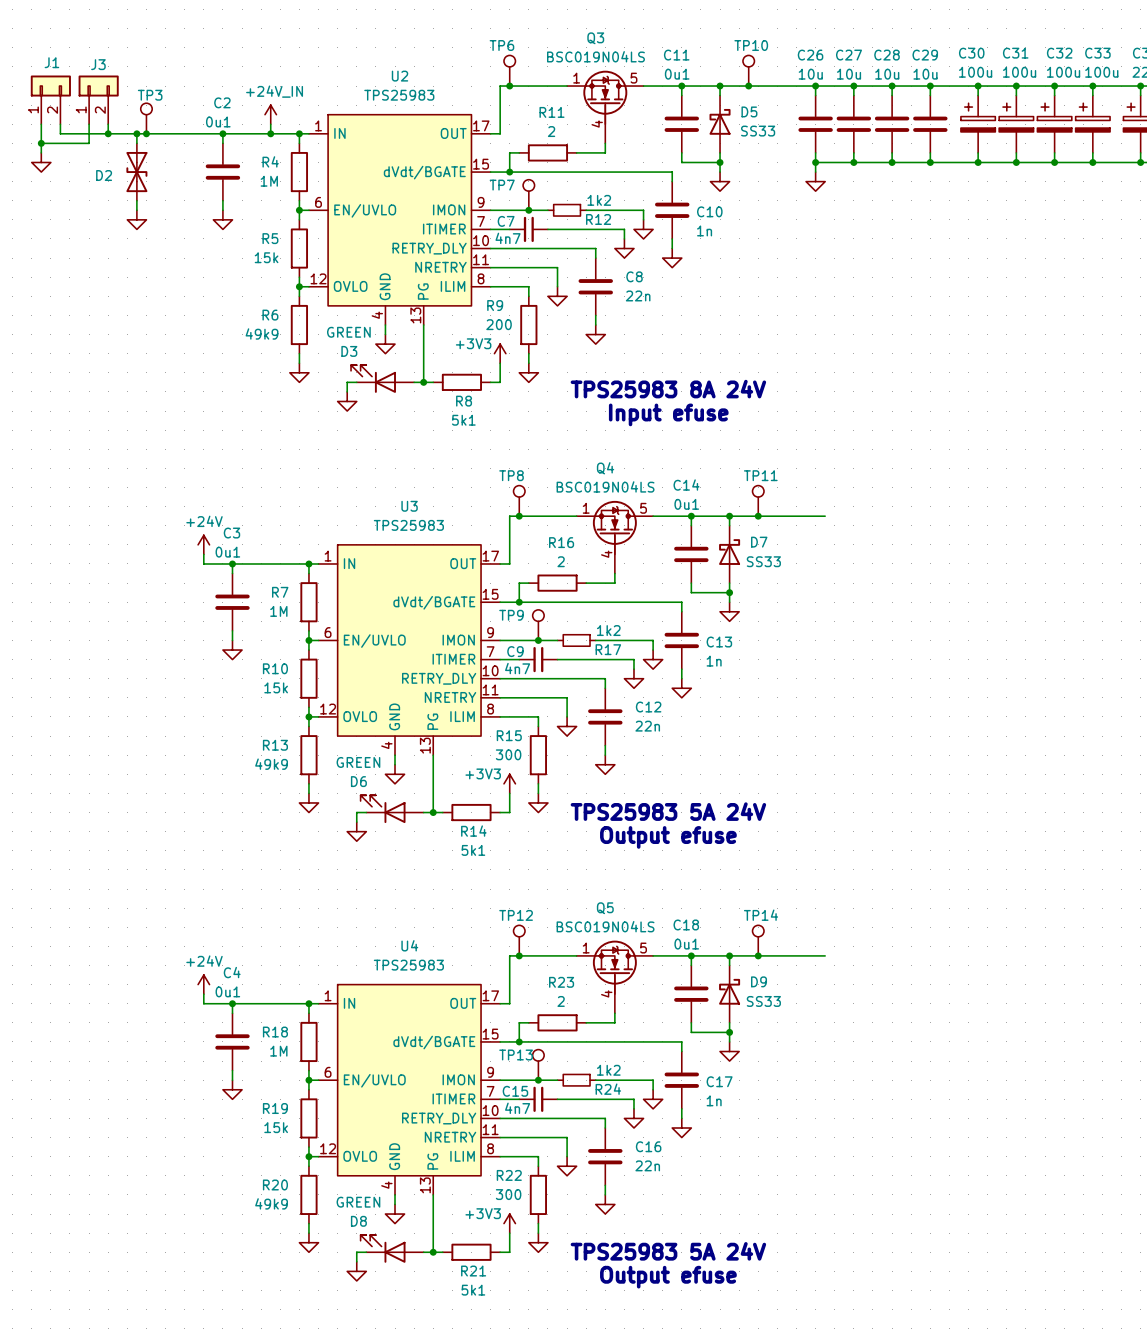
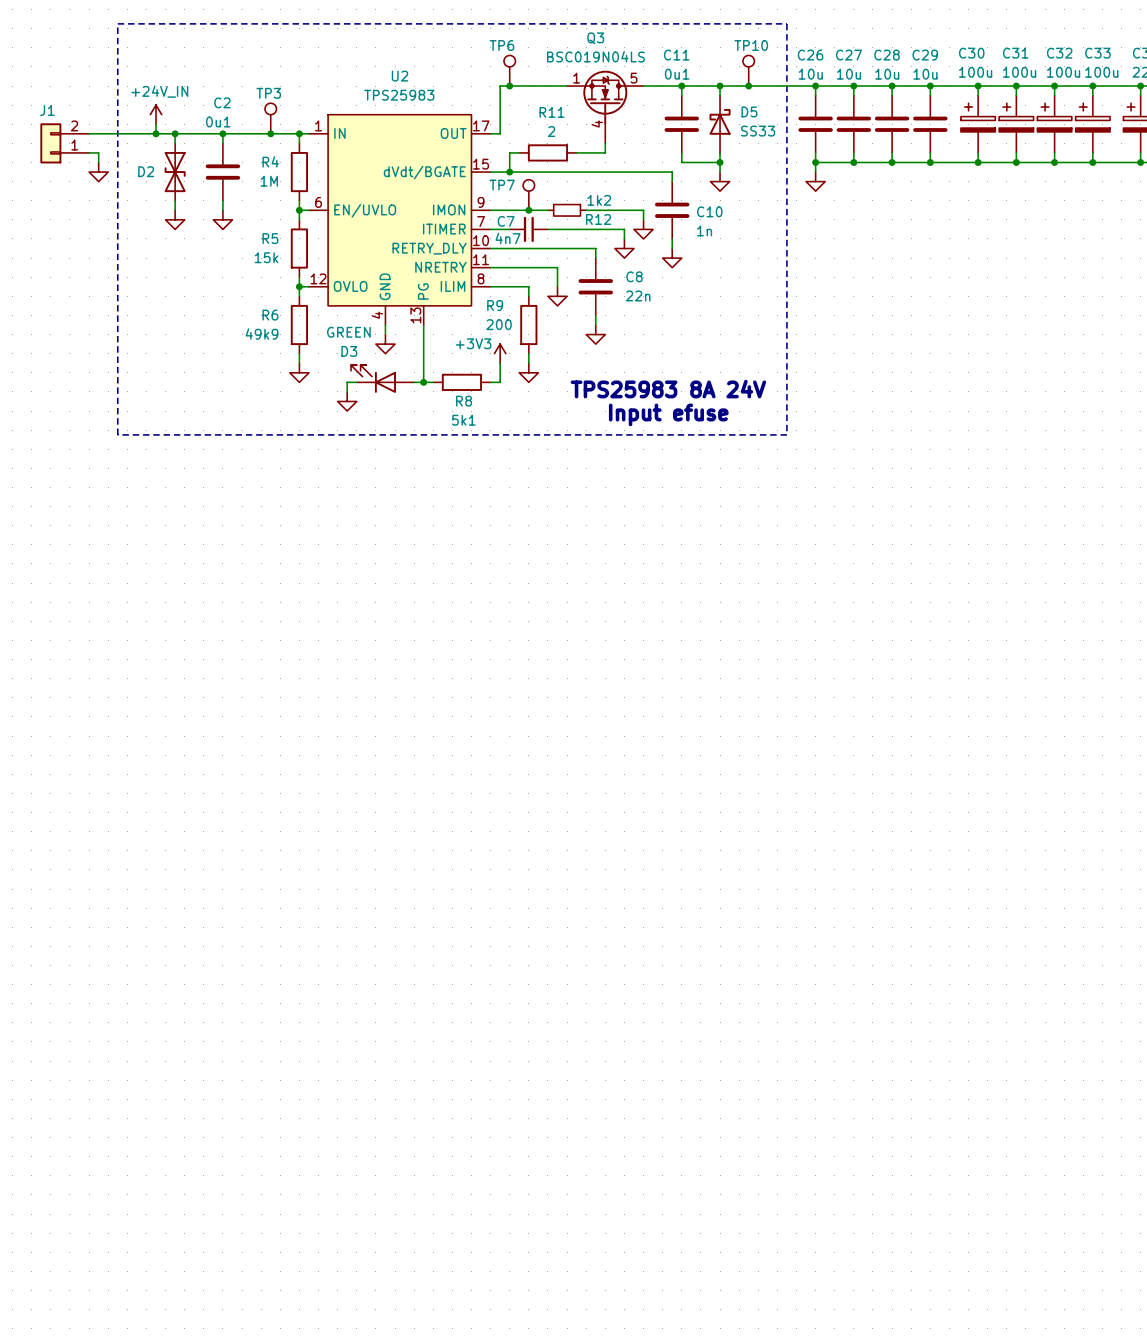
line: none -> (117, 23) (786, 23) (786, 434) (117, 434) (117, 23)
J1 name position: J1 (51, 62) -> J1 (47, 110)
J1 rotation: 0° (50, 86) -> 90° counterclockwise (50, 143)
TP3 name position: TP3 (150, 95) -> TP3 (268, 93)
J1 position: (50, 99) -> (64, 143)
J3: (98, 99) -> none
power symbol position: +24V_IN (270, 114) -> +24V_IN (156, 114)
TP3 position: (146, 118) -> (270, 118)
wire: (89, 124) (89, 143) (41, 143) -> none
wire: (108, 124) (108, 133) -> (156, 124) (156, 133)
junction: (108, 133) -> none
wire: (136, 133) (136, 143) -> (175, 133) (175, 143)
junction: (136, 133) -> none
junction: (146, 133) -> none
junction: none -> (156, 133)
junction: none -> (175, 133)
junction: (41, 143) -> none
wire: none -> (89, 152) (98, 152) (98, 162)
power symbol: (41, 162) -> none
power symbol: none -> (98, 172)
D2 position: (136, 172) -> (175, 172)
D2 name position: D2 (104, 175) -> D2 (146, 171)
wire: (136, 200) (136, 210) -> (175, 200) (175, 210)
power symbol: (136, 219) -> none
power symbol: none -> (175, 219)
TP8: (519, 500) -> none
TP11: (758, 500) -> none
junction: (519, 516) -> none
wire: (576, 516) (509, 516) (509, 563) (500, 563) -> none
wire: (653, 516) (825, 516) -> none
wire: (691, 516) (691, 525) -> none
junction: (691, 516) -> none
wire: (729, 516) (729, 525) -> none
junction: (729, 516) -> none
junction: (758, 516) -> none
Q4: BSC019N04LS (614, 537) -> none
power symbol: +24V (203, 544) -> none
wire: (203, 554) (203, 563) (318, 563) -> none
C14: 0u1 (691, 554) -> none
D7: SS33 (729, 554) -> none
wire: (232, 563) (232, 573) -> none
junction: (232, 563) -> none
wire: (308, 563) (308, 573) -> none
junction: (308, 563) -> none
wire: (614, 573) (614, 583) (586, 583) -> none
wire: (528, 583) (519, 583) (519, 602) -> none
R16: 2 (557, 583) -> none
wire: (691, 583) (691, 592) (729, 592) -> none
wire: (729, 583) (729, 602) -> none
junction: (729, 592) -> none
C3: 0u1 (232, 602) -> none
R7: 1M (308, 602) -> none
wire: (500, 602) (681, 602) (681, 611) -> none
junction: (519, 602) -> none
power symbol: (729, 611) -> none
TP9: (538, 625) -> none
wire: (232, 630) (232, 640) -> none
wire: (308, 630) (308, 650) -> none
wire: (308, 640) (318, 640) -> none
junction: (308, 640) -> none
wire: (500, 640) (557, 640) -> none
junction: (538, 640) -> none
R17: 1k2 (576, 640) -> none
wire: (595, 640) (653, 640) (653, 650) -> none
C13: 1n (681, 640) -> none
power symbol: (232, 650) -> none
U3: TPS25983 (409, 650) -> none
wire: (500, 659) (519, 659) -> none
C9: 4n7 (538, 659) -> none
wire: (557, 659) (633, 659) (633, 669) -> none
power symbol: (653, 659) -> none
wire: (681, 669) (681, 678) -> none
R10: 15k (308, 678) -> none
wire: (500, 678) (605, 678) (605, 688) -> none
power symbol: (633, 678) -> none
power symbol: (681, 688) -> none
wire: (500, 697) (567, 697) (567, 716) -> none
wire: (308, 707) (308, 726) -> none
wire: (308, 716) (318, 716) -> none
junction: (308, 716) -> none
wire: (500, 716) (538, 716) (538, 726) -> none
C12: 22n (605, 716) -> none
power symbol: (567, 726) -> none
wire: (605, 745) (605, 755) -> none
R13: 49k9 (308, 755) -> none
wire: (395, 755) (395, 764) -> none
wire: (433, 755) (433, 812) -> none
R15: 300 (538, 755) -> none
power symbol: (605, 764) -> none
power symbol: (395, 774) -> none
wire: (308, 783) (308, 793) -> none
power symbol: +3V3 (509, 783) -> none
wire: (538, 783) (538, 793) -> none
wire: (509, 793) (509, 812) (500, 812) -> none
power symbol: (308, 802) -> none
power symbol: (538, 802) -> none
D6: GREEN (392, 809) -> none
text: TPS25983 5A 24V (668, 811) -> none
wire: (366, 812) (356, 812) (356, 822) -> none
wire: (423, 812) (442, 812) -> none
junction: (433, 812) -> none
R14: 5k1 (471, 812) -> none
power symbol: (356, 831) -> none
text: Output efuse (668, 837) -> none
TP12: (519, 940) -> none
TP14: (758, 940) -> none
junction: (519, 955) -> none
wire: (576, 955) (509, 955) (509, 1003) (500, 1003) -> none
wire: (653, 955) (825, 955) -> none
wire: (691, 955) (691, 965) -> none
junction: (691, 955) -> none
wire: (729, 955) (729, 965) -> none
junction: (729, 955) -> none
junction: (758, 955) -> none
Q5: BSC019N04LS (614, 976) -> none
power symbol: +24V (203, 984) -> none
wire: (203, 994) (203, 1003) (318, 1003) -> none
C18: 0u1 (691, 994) -> none
D9: SS33 (729, 994) -> none
wire: (232, 1003) (232, 1013) -> none
junction: (232, 1003) -> none
wire: (308, 1003) (308, 1013) -> none
junction: (308, 1003) -> none
wire: (614, 1013) (614, 1022) (586, 1022) -> none
wire: (528, 1022) (519, 1022) (519, 1041) -> none
R23: 2 (557, 1022) -> none
wire: (691, 1022) (691, 1032) (729, 1032) -> none
wire: (729, 1022) (729, 1041) -> none
junction: (729, 1032) -> none
C4: 0u1 (232, 1041) -> none
R18: 1M (308, 1041) -> none
wire: (500, 1041) (681, 1041) (681, 1051) -> none
junction: (519, 1041) -> none
power symbol: (729, 1051) -> none
TP13: (538, 1064) -> none
wire: (232, 1070) (232, 1080) -> none
wire: (308, 1070) (308, 1089) -> none
wire: (308, 1080) (318, 1080) -> none
junction: (308, 1080) -> none
wire: (500, 1080) (557, 1080) -> none
junction: (538, 1080) -> none
R24: 1k2 (576, 1080) -> none
wire: (595, 1080) (653, 1080) (653, 1089) -> none
C17: 1n (681, 1080) -> none
power symbol: (232, 1089) -> none
U4: TPS25983 (409, 1089) -> none
wire: (500, 1099) (519, 1099) -> none
C15: 4n7 (538, 1099) -> none
wire: (557, 1099) (633, 1099) (633, 1108) -> none
power symbol: (653, 1099) -> none
wire: (681, 1108) (681, 1118) -> none
R19: 15k (308, 1118) -> none
wire: (500, 1118) (605, 1118) (605, 1128) -> none
power symbol: (633, 1118) -> none
power symbol: (681, 1128) -> none
wire: (500, 1137) (567, 1137) (567, 1156) -> none
wire: (308, 1147) (308, 1166) -> none
wire: (308, 1156) (318, 1156) -> none
junction: (308, 1156) -> none
wire: (500, 1156) (538, 1156) (538, 1166) -> none
C16: 22n (605, 1156) -> none
power symbol: (567, 1166) -> none
wire: (605, 1185) (605, 1194) -> none
R20: 49k9 (308, 1194) -> none
wire: (395, 1194) (395, 1204) -> none
wire: (433, 1194) (433, 1252) -> none
R22: 300 (538, 1194) -> none
power symbol: (605, 1204) -> none
power symbol: (395, 1214) -> none
wire: (308, 1223) (308, 1233) -> none
power symbol: +3V3 (509, 1223) -> none
wire: (538, 1223) (538, 1233) -> none
wire: (509, 1233) (509, 1252) (500, 1252) -> none
power symbol: (308, 1242) -> none
power symbol: (538, 1242) -> none
D8: GREEN (392, 1248) -> none
text: TPS25983 5A 24V (668, 1251) -> none
wire: (366, 1252) (356, 1252) (356, 1261) -> none
wire: (423, 1252) (442, 1252) -> none
junction: (433, 1252) -> none
R21: 5k1 (471, 1252) -> none
power symbol: (356, 1271) -> none
text: Output efuse (668, 1277) -> none

